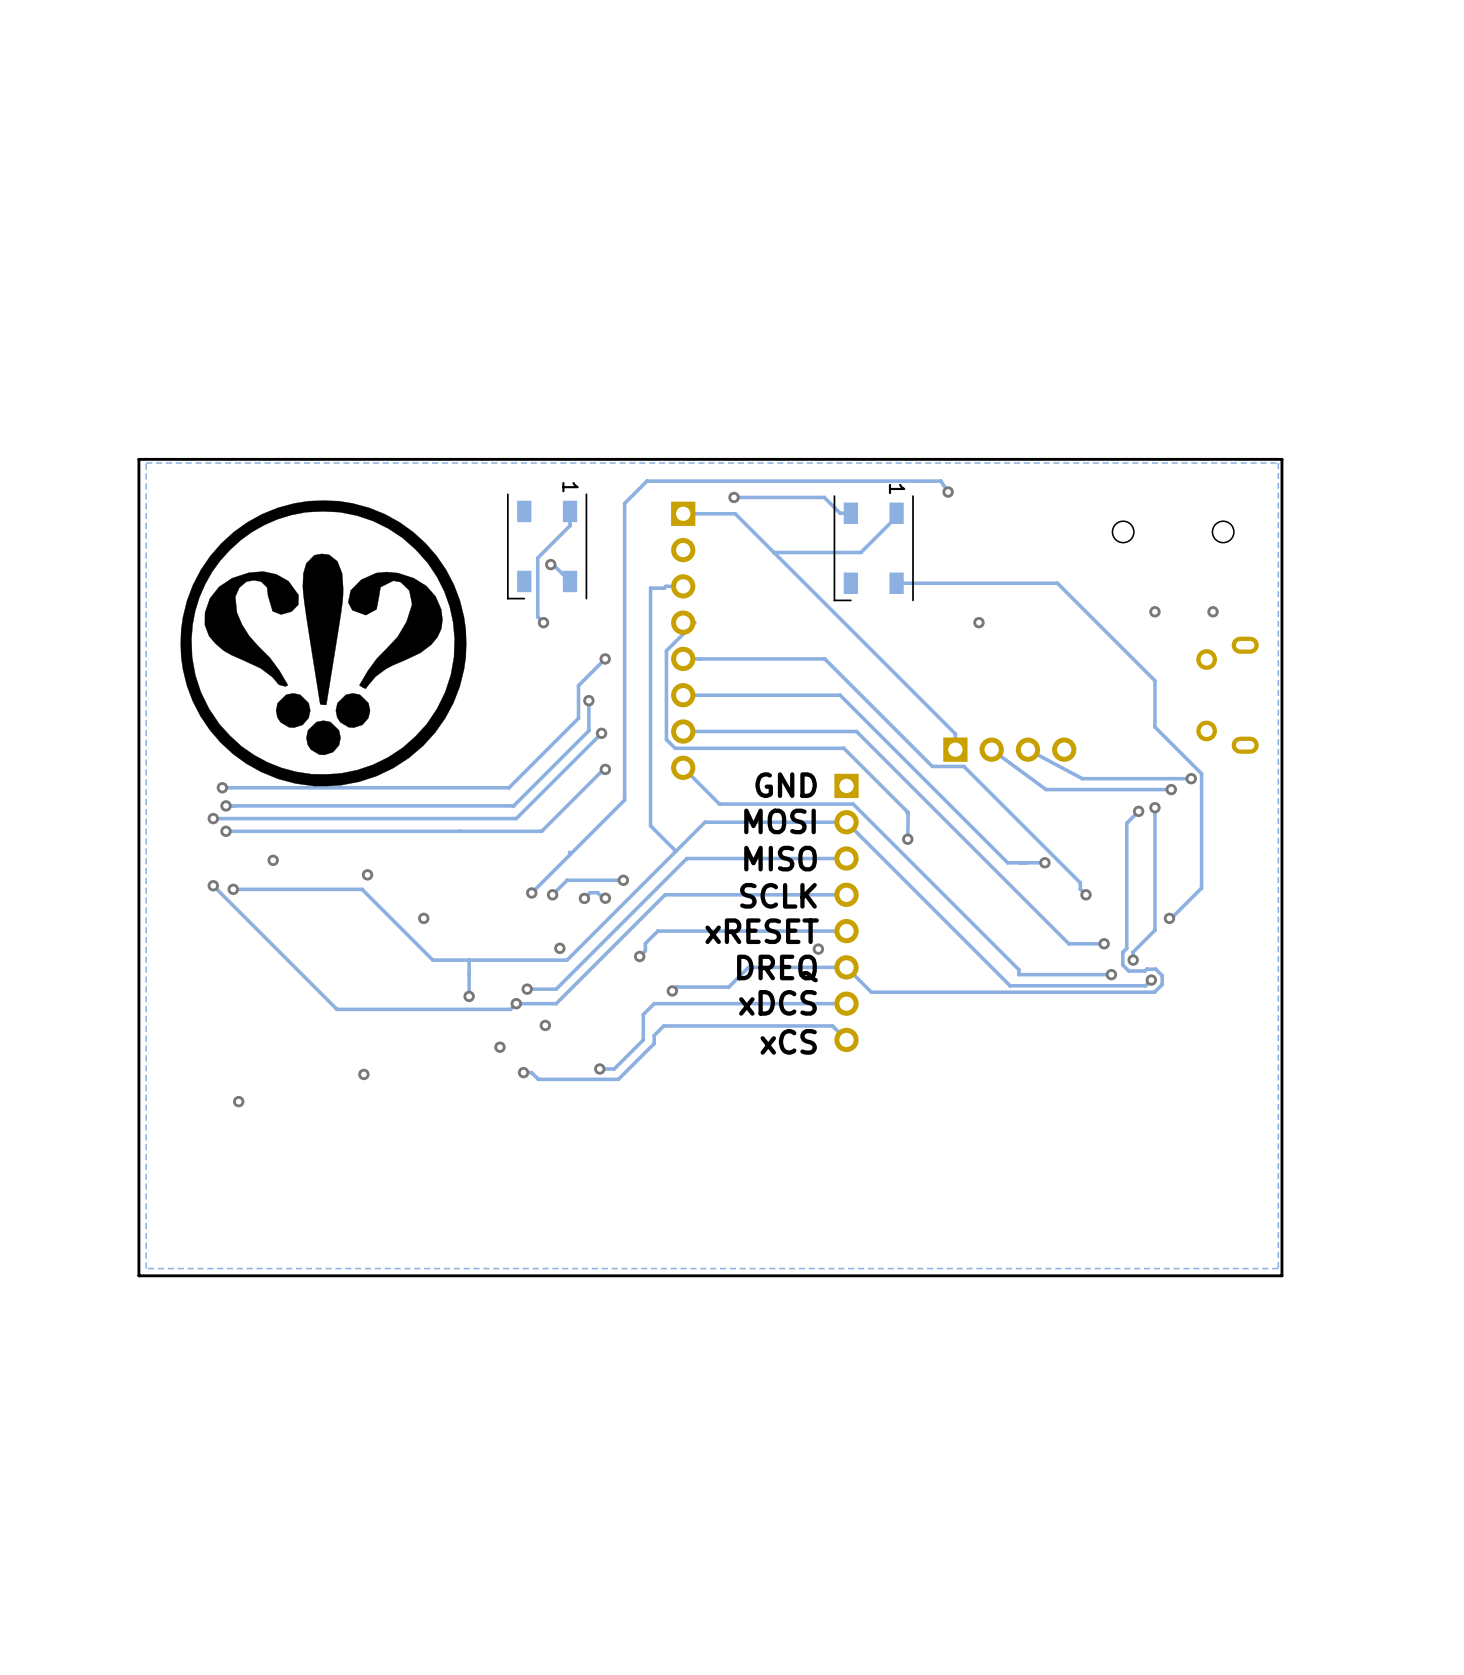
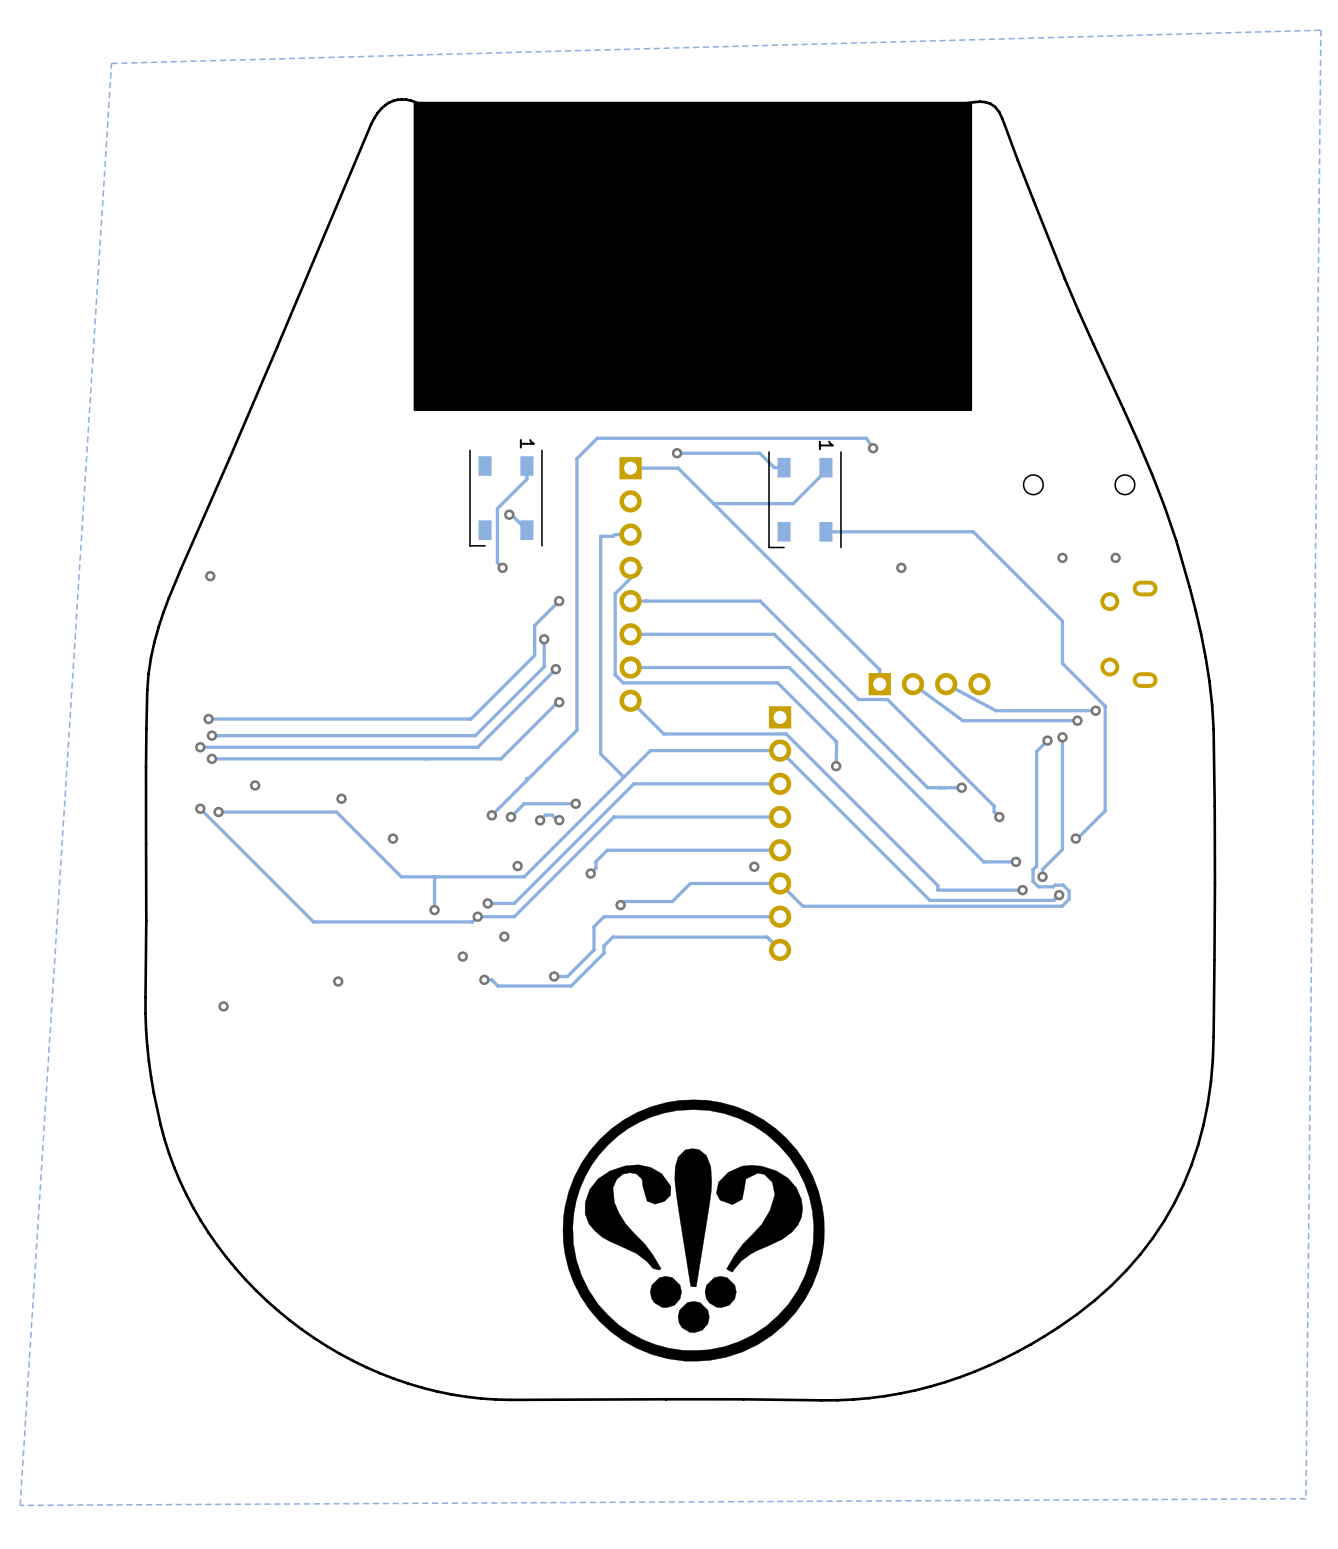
zone outline: none -> (1320, 30) (111, 63) (20, 1505) (1305, 1498) (1320, 30)
drawing: none -> [413, 101, 973, 412]
board edge: (1281, 459) (1281, 1275) (138, 1275) (138, 459) (1281, 459) -> (401, 99) (419, 103) (964, 103) (980, 101) (990, 103) (999, 112) (1064, 278) (1138, 441) (1176, 540) (1195, 610) (1209, 681) (1213, 729) (1214, 806) (1212, 1059) (1203, 1124) (1191, 1165) (1164, 1220) (1126, 1270) (1077, 1314) (1044, 1336) (1003, 1358) (960, 1377) (930, 1386) (884, 1396) (853, 1399) (510, 1399) (451, 1394) (422, 1387) (379, 1373) (339, 1353) (301, 1329) (266, 1300) (235, 1268) (208, 1233) (186, 1194) (169, 1153) (160, 1124) (151, 1077) (146, 1029) (146, 728) (147, 690) (150, 658) (168, 597) (371, 124) (385, 105) (401, 99)
zone outline: (1278, 462) (1278, 1268) (146, 1268) (146, 462) (1278, 462) -> none
drawing: [180, 500, 467, 787] -> none
text: GND (786, 785) -> none
text: MOSI (780, 821) -> none
text: MISO (780, 858) -> none
text: SCLK (778, 895) -> none
text: xRESET (762, 931) -> none
text: DREQ (777, 968) -> none
text: xDCS (777, 1002) -> none
text: xCS (788, 1041) -> none
drawing: none -> [562, 1099, 825, 1362]

